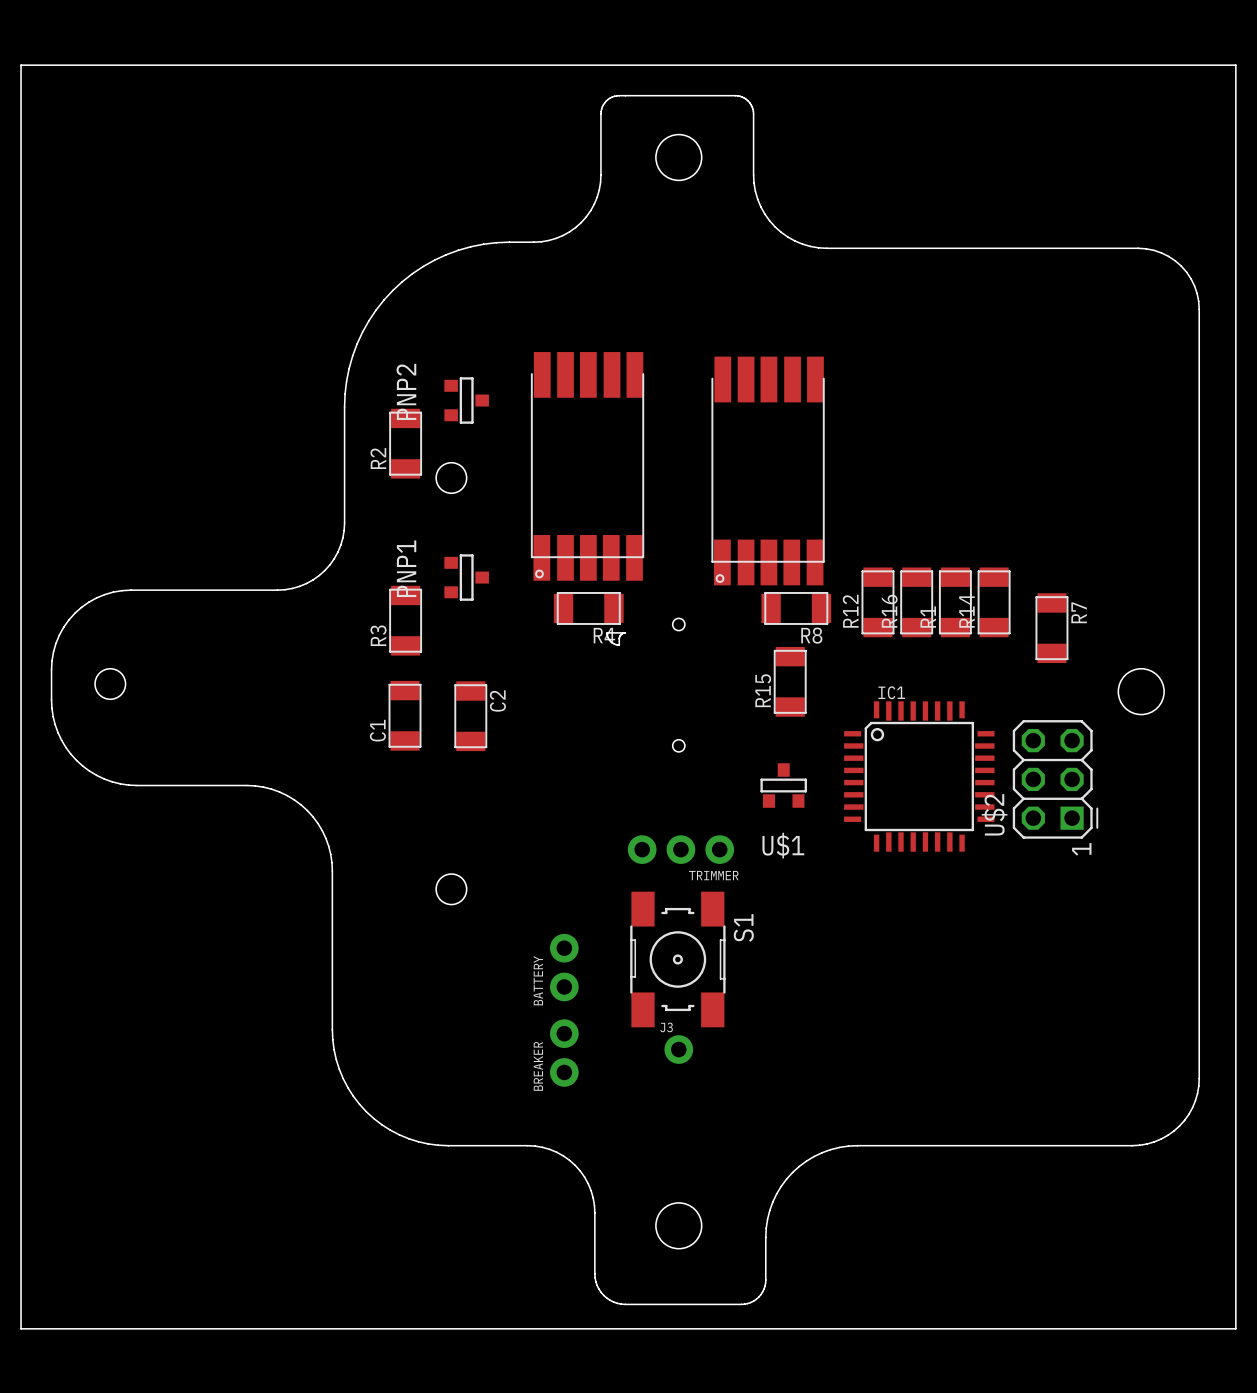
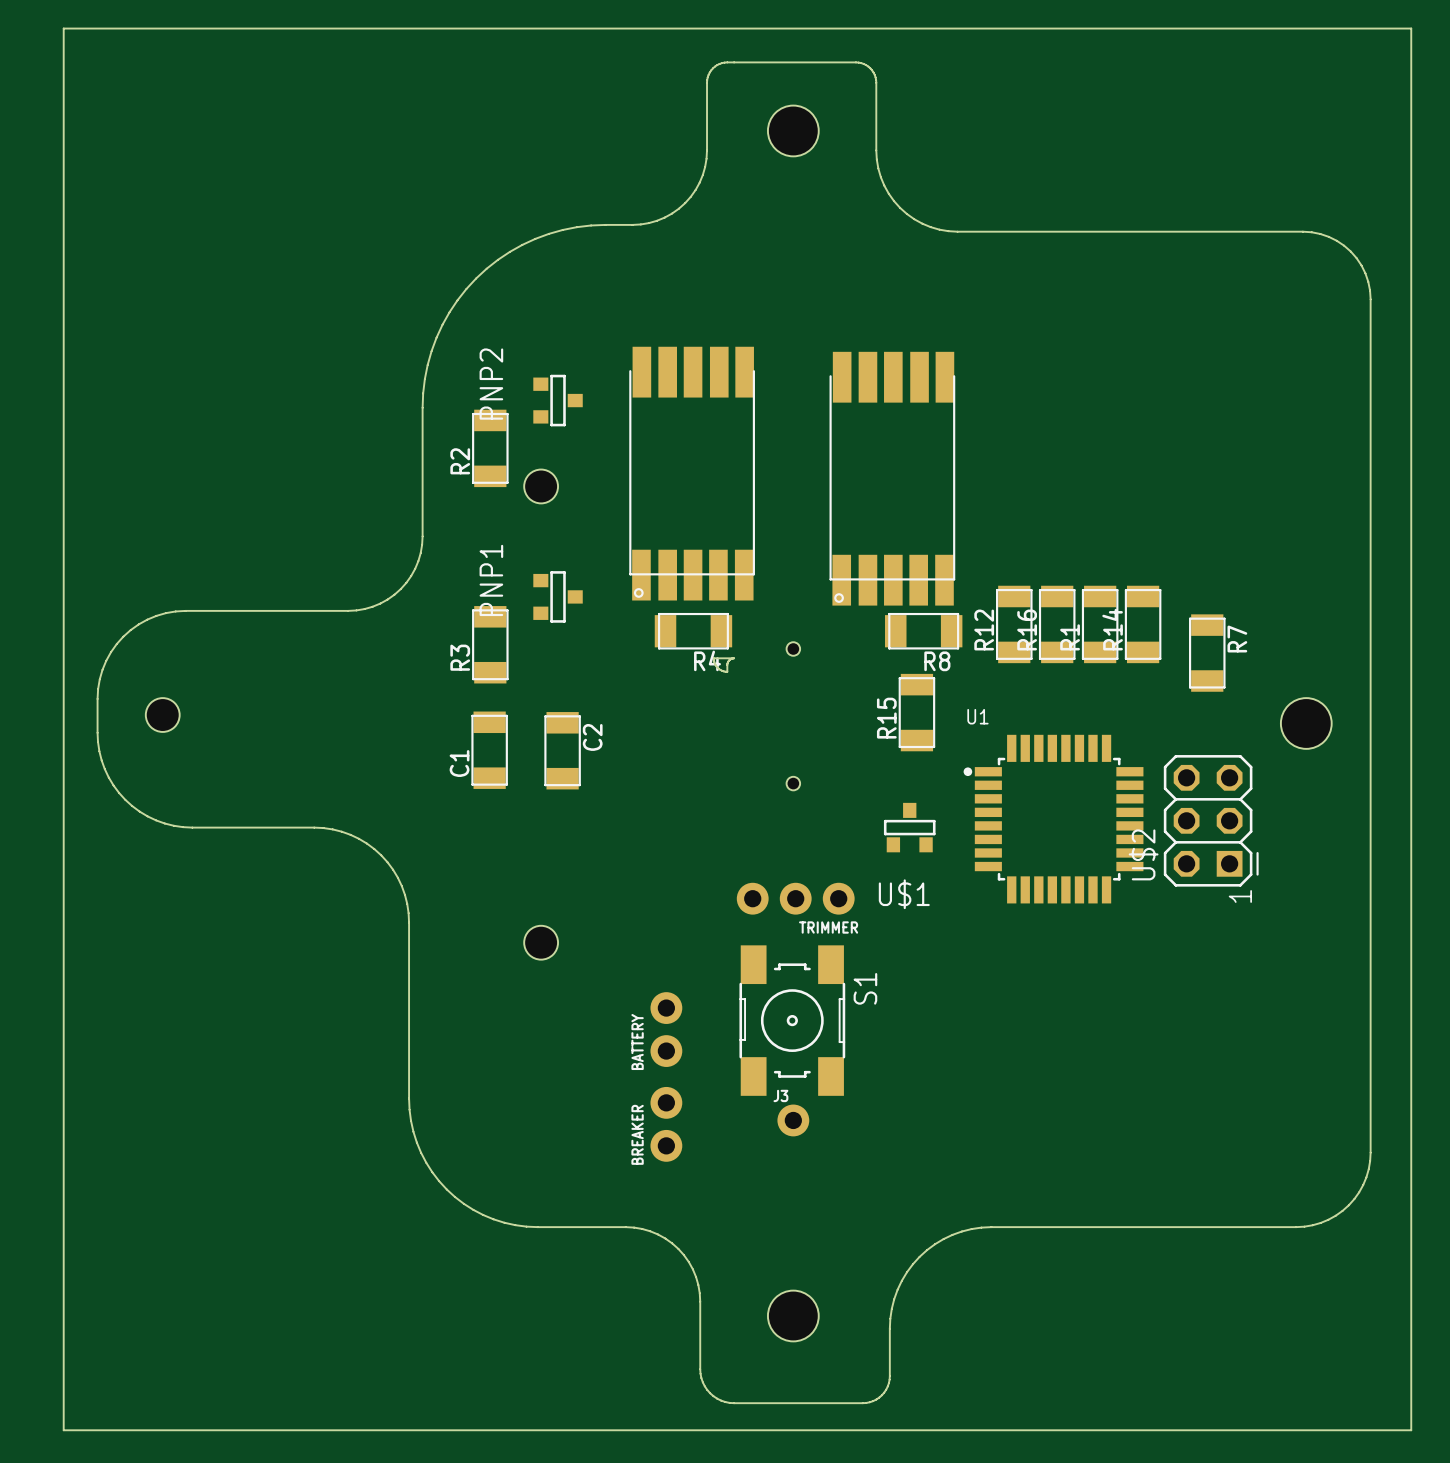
IC1: (919, 776) -> none
U1: none -> (1053, 819)

